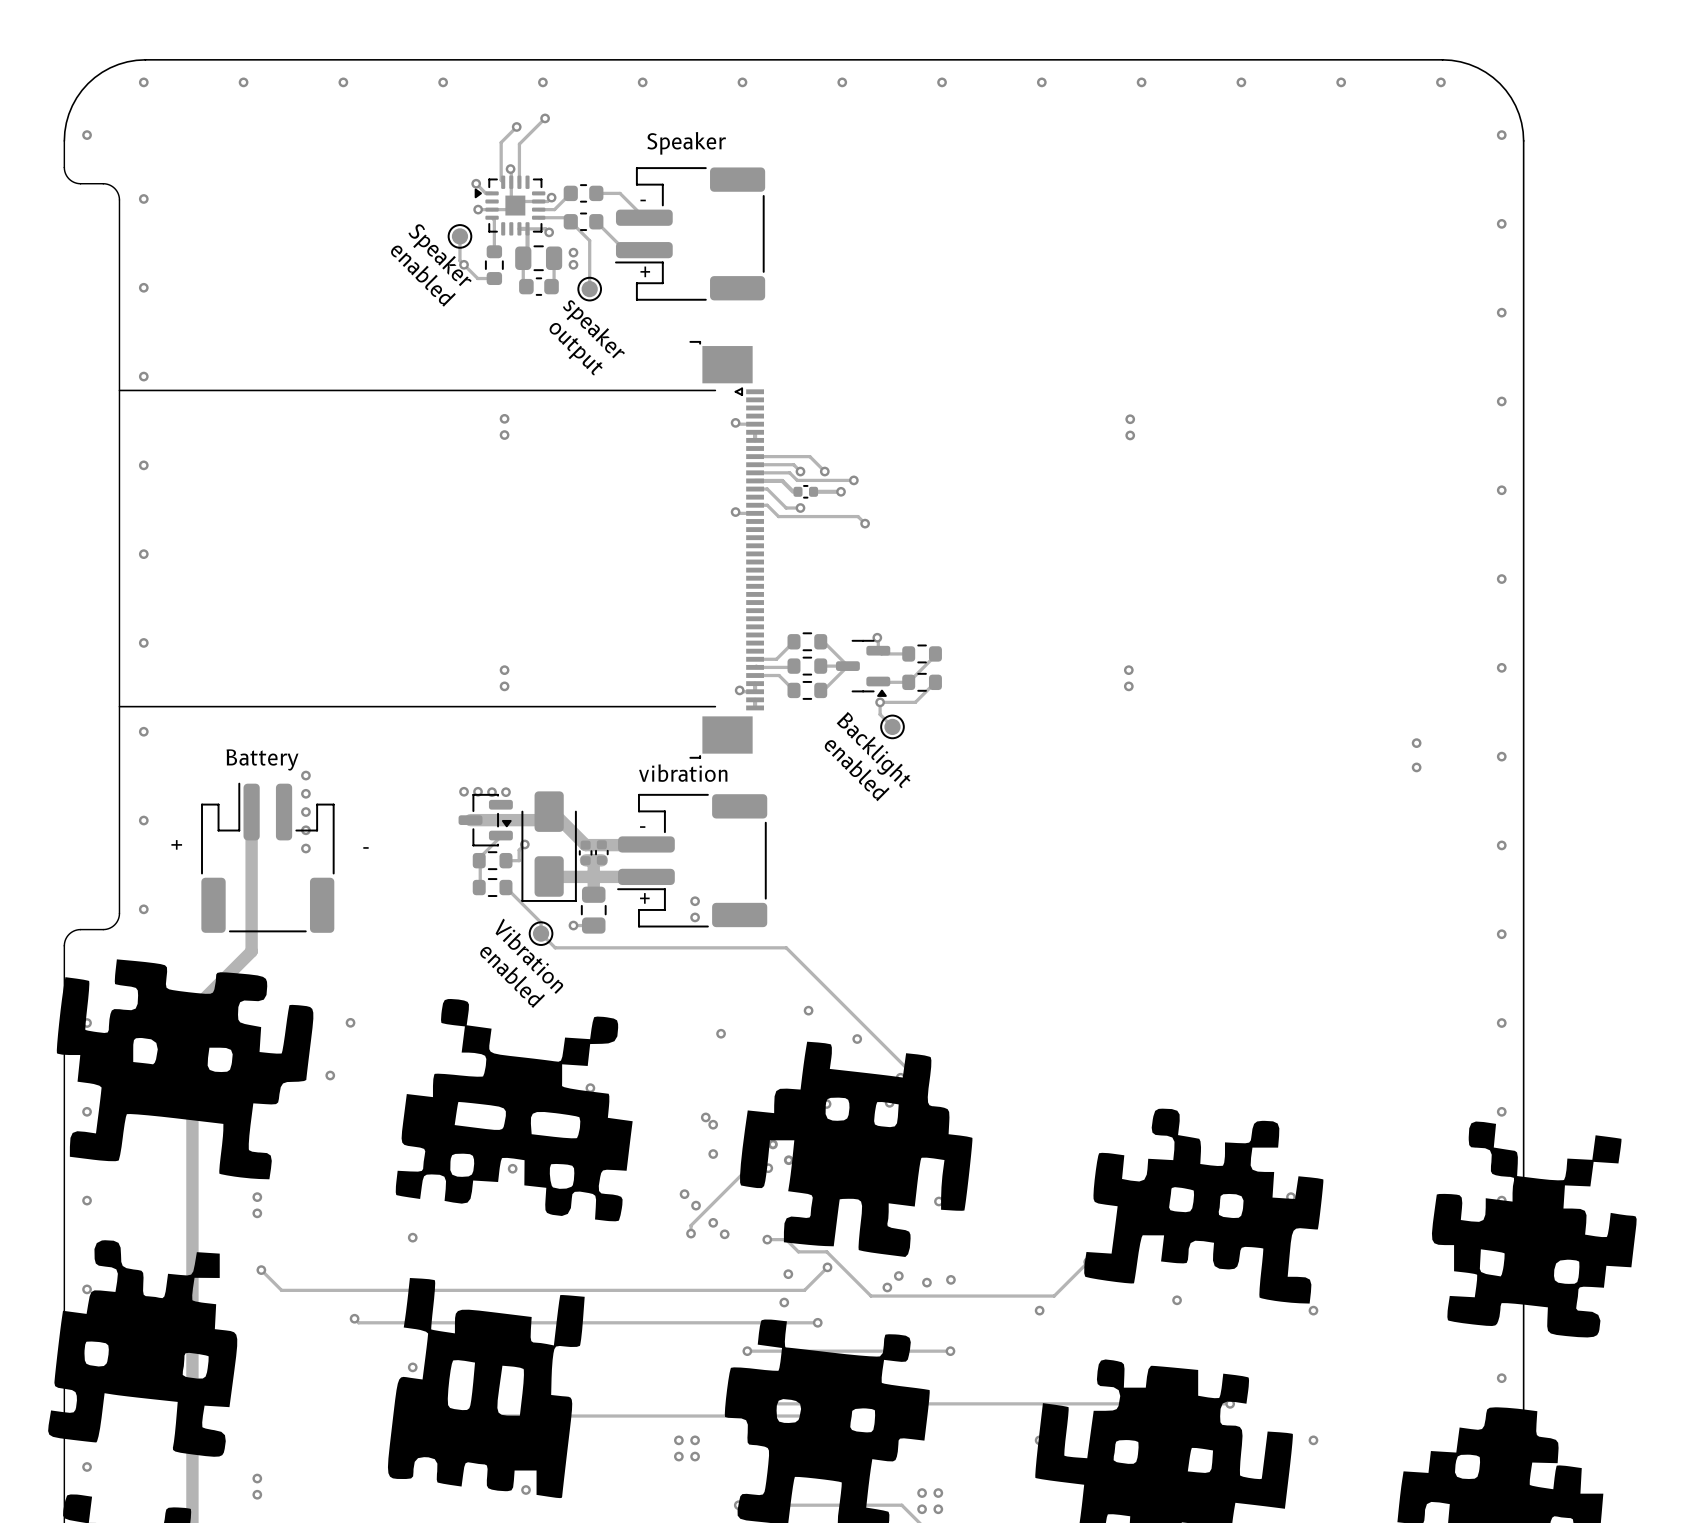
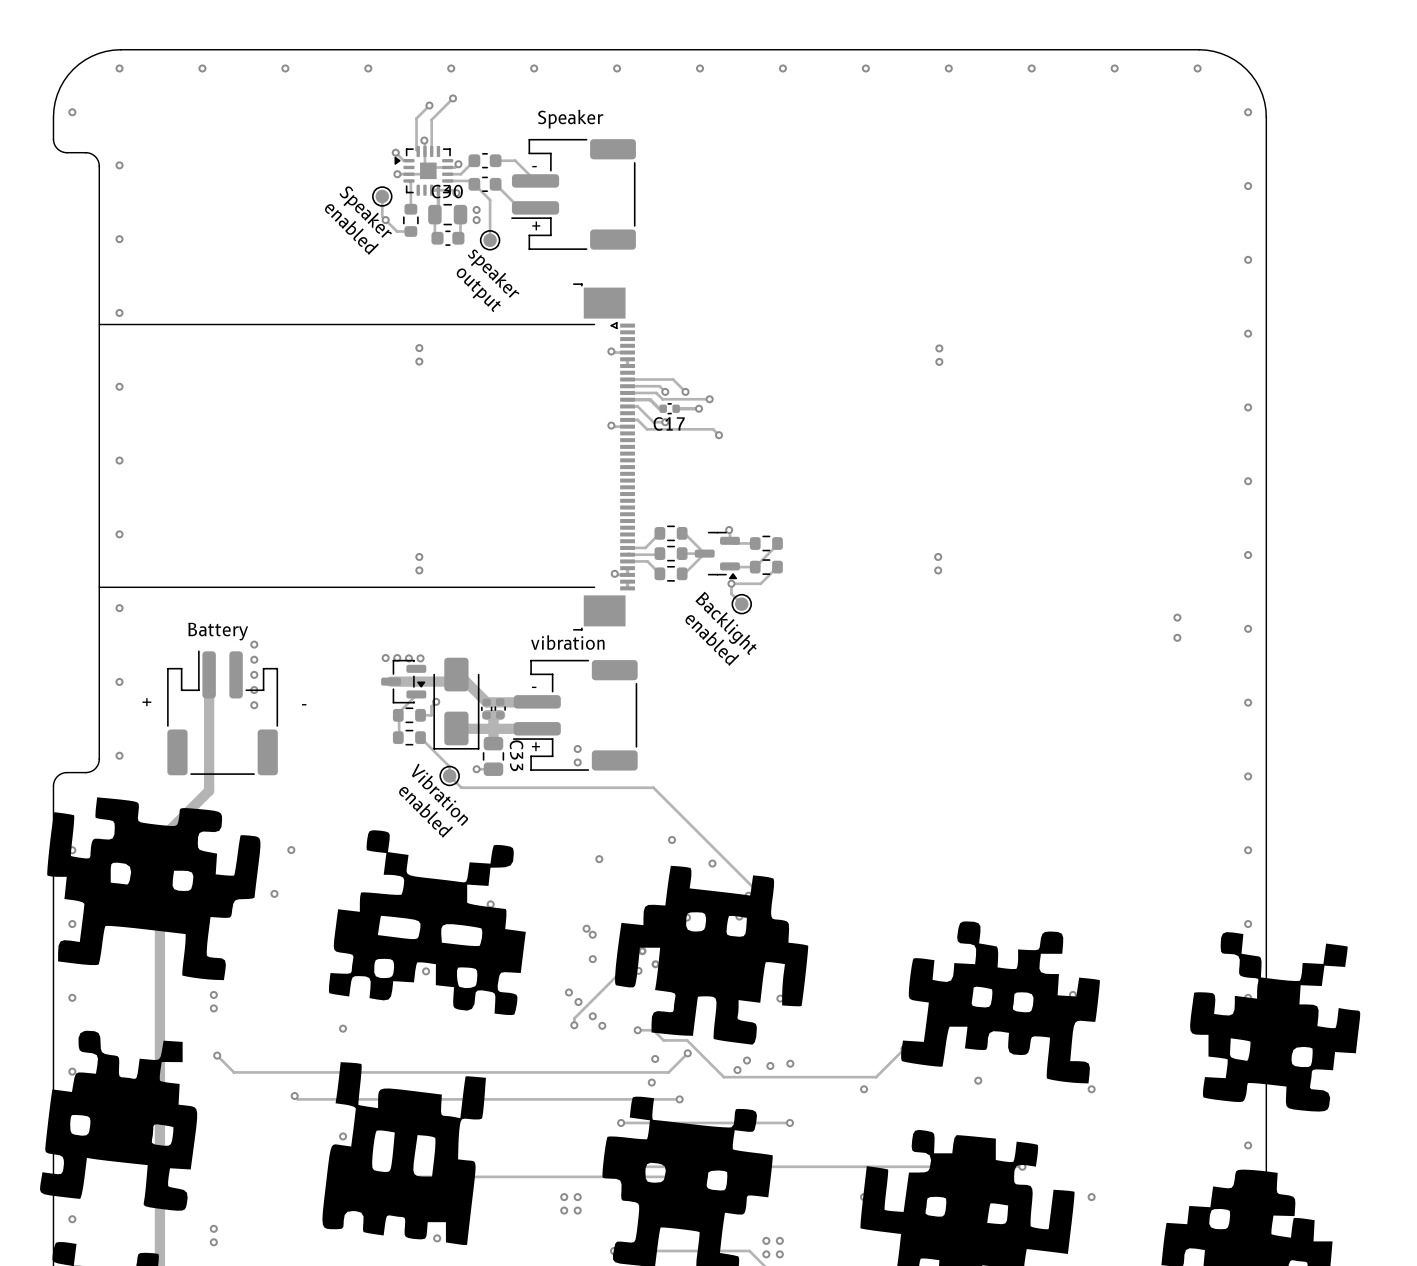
C30 name: none -> C30 (447, 191)
C17 name: none -> C17 (669, 423)
C33 name: none -> C33 (516, 755)

